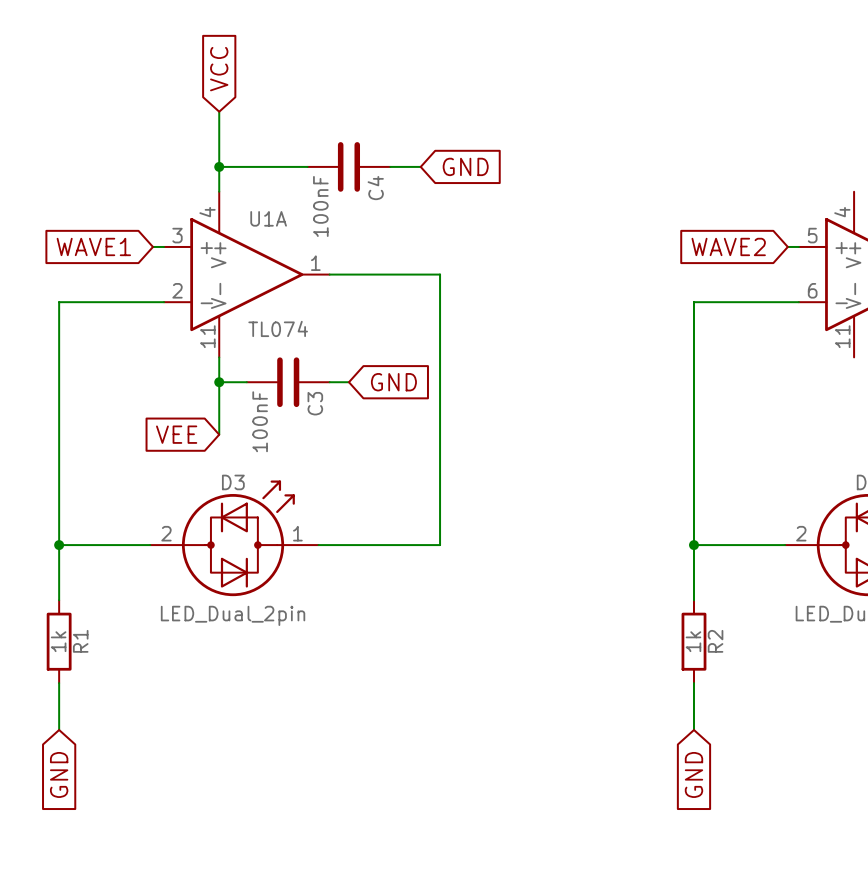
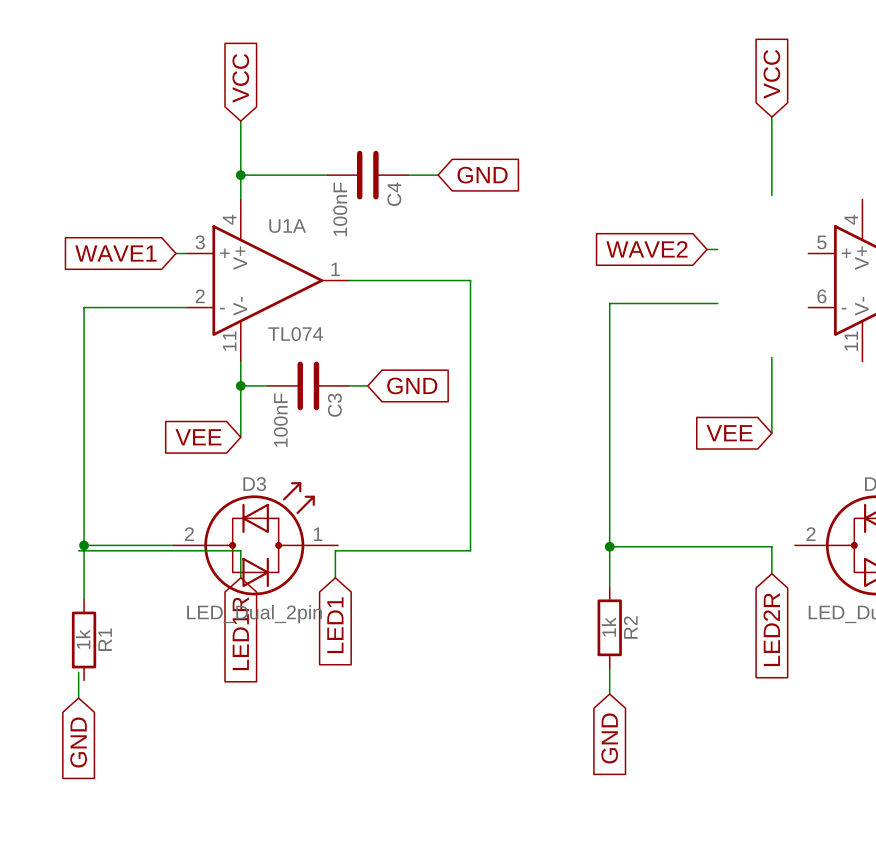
global label: none -> VCC (771, 74)
wire: none -> (771, 117) (771, 195)
global label position: WAVE2 (728, 246) -> WAVE2 (646, 249)
wire: (787, 246) (798, 246) -> (707, 249) (717, 249)
wire: (440, 274) (440, 545) (318, 545) -> (457, 280) (470, 280) (470, 550) (335, 550) (335, 577)
wire: none -> (717, 303) (609, 303) (609, 587)
wire: (798, 302) (693, 302) (693, 600) -> none
wire: none -> (771, 357) (771, 433)
global label: none -> VEE (729, 433)
wire: (693, 545) (785, 545) -> none
junction: (693, 545) -> none
wire: none -> (609, 546) (771, 546) (771, 573)
junction: none -> (609, 546)
wire: none -> (78, 550) (240, 550) (240, 577)
global label: none -> LED1 (335, 625)
global label: none -> LED2R (771, 629)
global label: none -> LED1R (240, 633)
R2 position: (693, 641) -> (609, 627)
wire: none -> (609, 668) (609, 694)
wire: none -> (78, 672) (78, 698)
wire: (59, 683) (59, 730) -> none
wire: (693, 683) (693, 730) -> none
global label position: GND (59, 774) -> GND (78, 742)
global label position: GND (693, 774) -> GND (609, 738)

